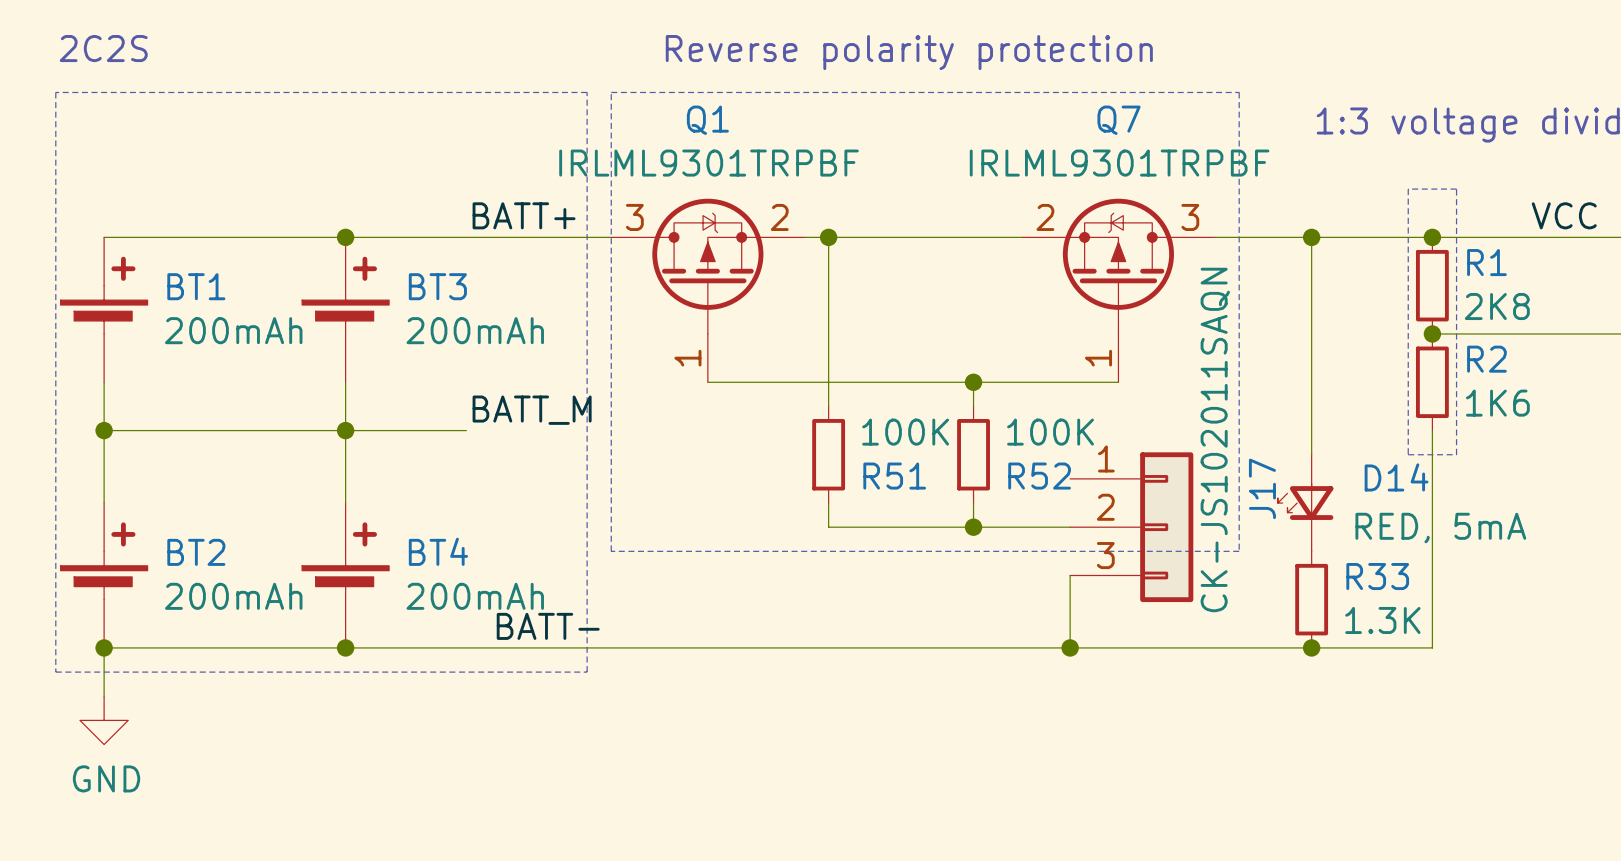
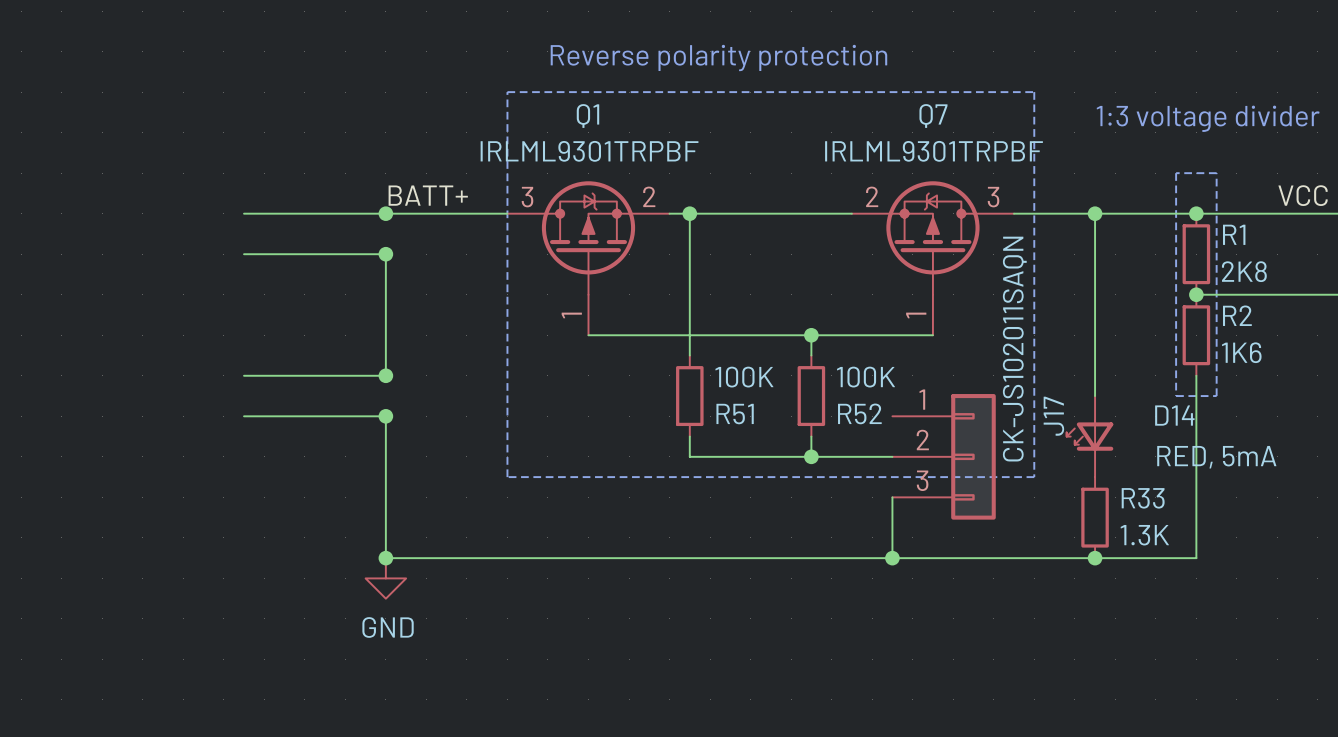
text: 2C2S (103, 48) -> none
line: (55, 92) (587, 92) (587, 672) (55, 672) (55, 92) -> none
wire: (104, 237) (297, 237) -> none
junction: (345, 237) -> none
junction: none -> (385, 213)
wire: none -> (244, 254) (385, 254) (385, 375)
junction: none -> (385, 254)
BT1: 200mAh (104, 309) -> none
BT3: 200mAh (345, 309) -> none
wire: (104, 382) (104, 503) -> none
wire: (345, 382) (345, 503) -> none
label: BATT_M (532, 410) -> none
wire: (104, 430) (297, 430) -> none
junction: (104, 430) -> none
junction: (345, 430) -> none
junction: none -> (385, 375)
junction: none -> (385, 416)
BT2: 200mAh (104, 575) -> none
BT4: 200mAh (345, 575) -> none
label: BATT- (548, 626) -> none
junction: (104, 647) -> none
junction: (345, 647) -> none
wire: (466, 647) (104, 647) (104, 696) -> (385, 558) (385, 416) (244, 416)
junction: none -> (385, 558)
power symbol position: GND (104, 720) -> GND (385, 578)

